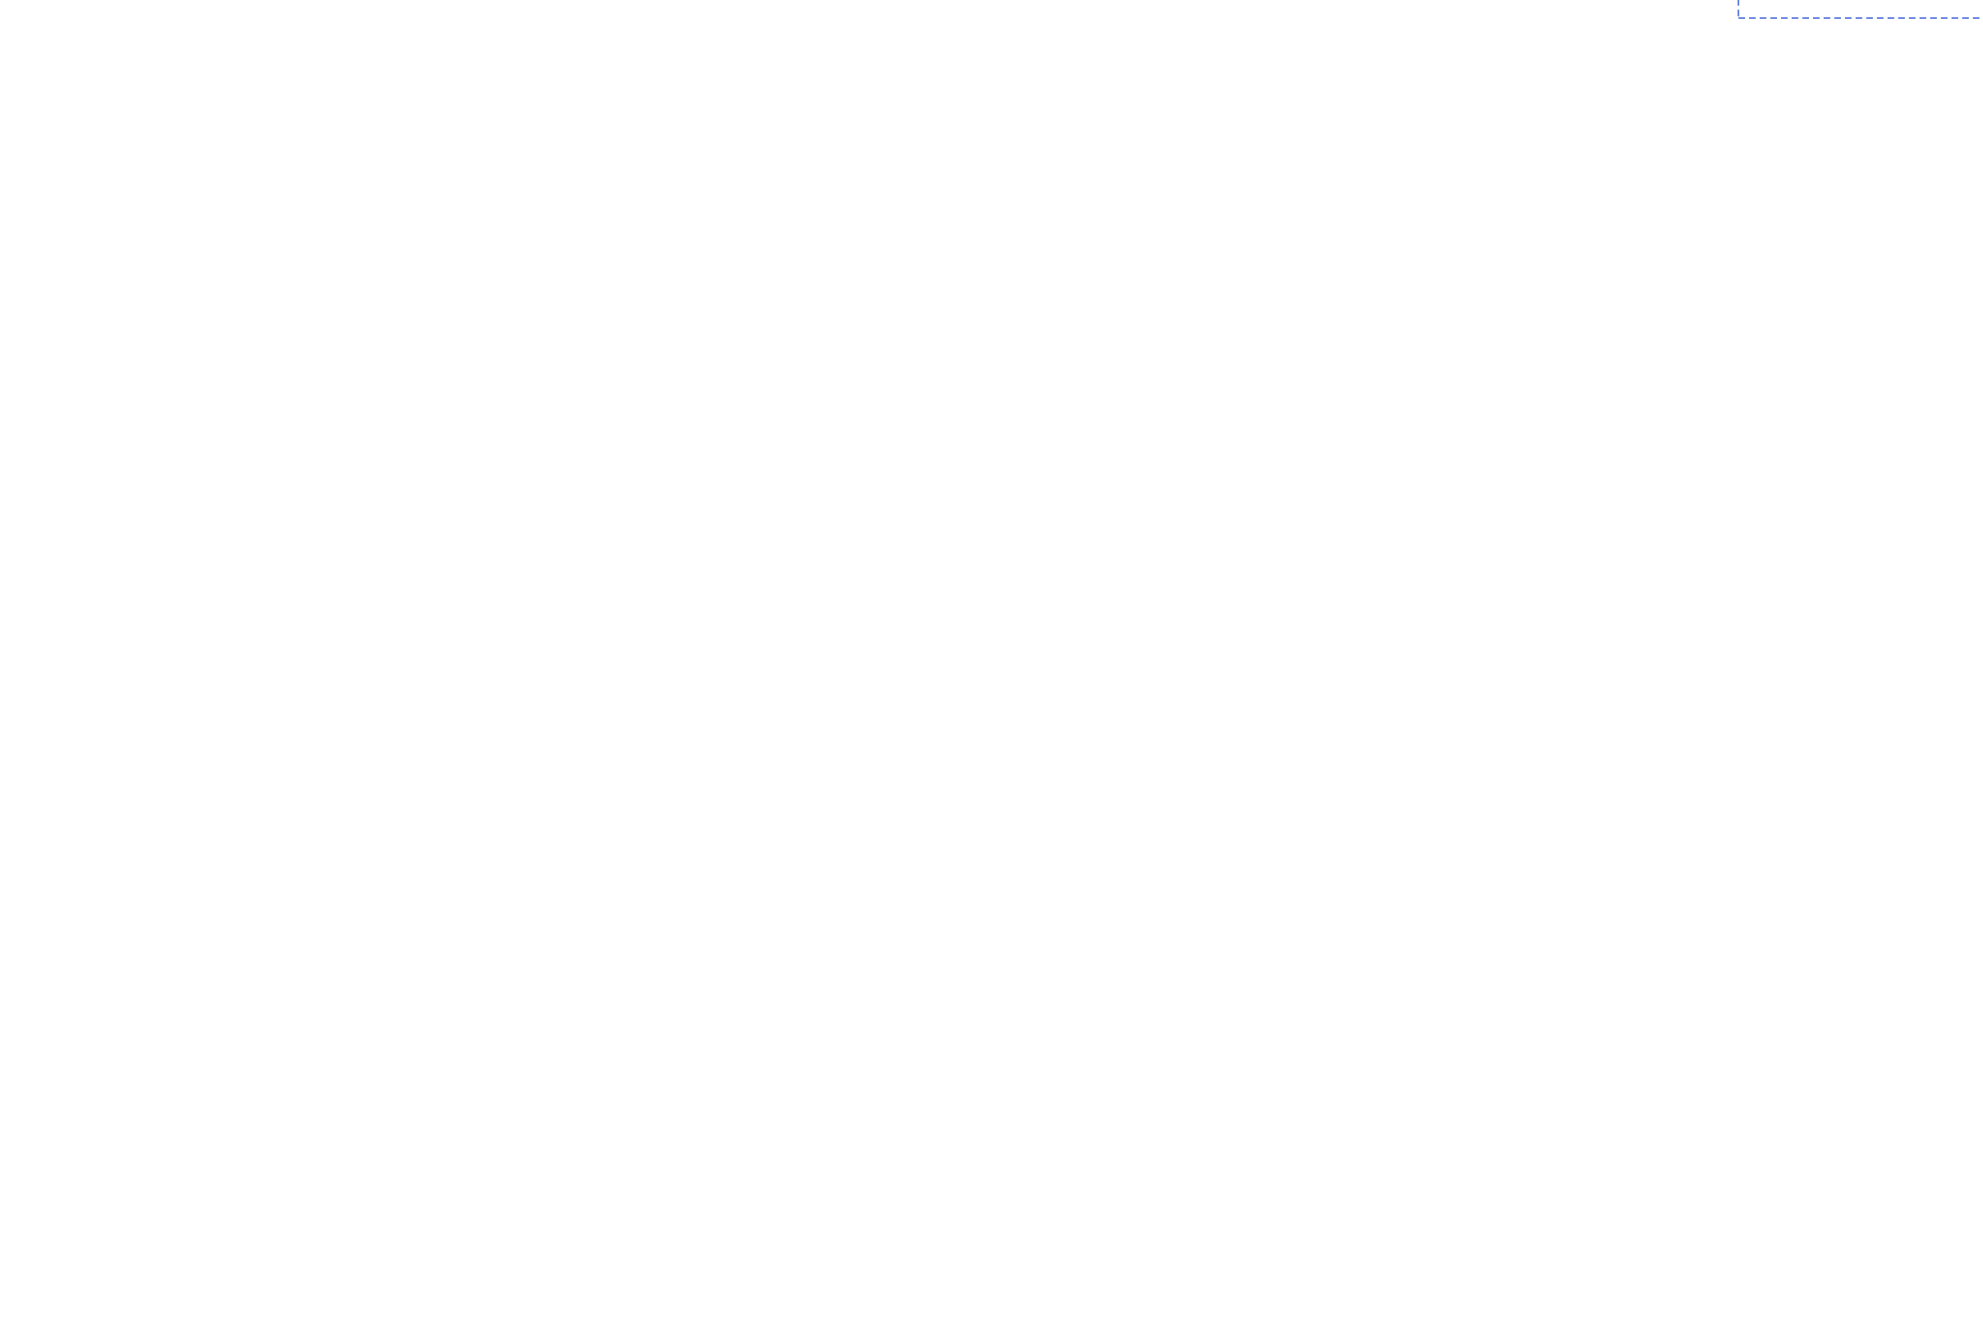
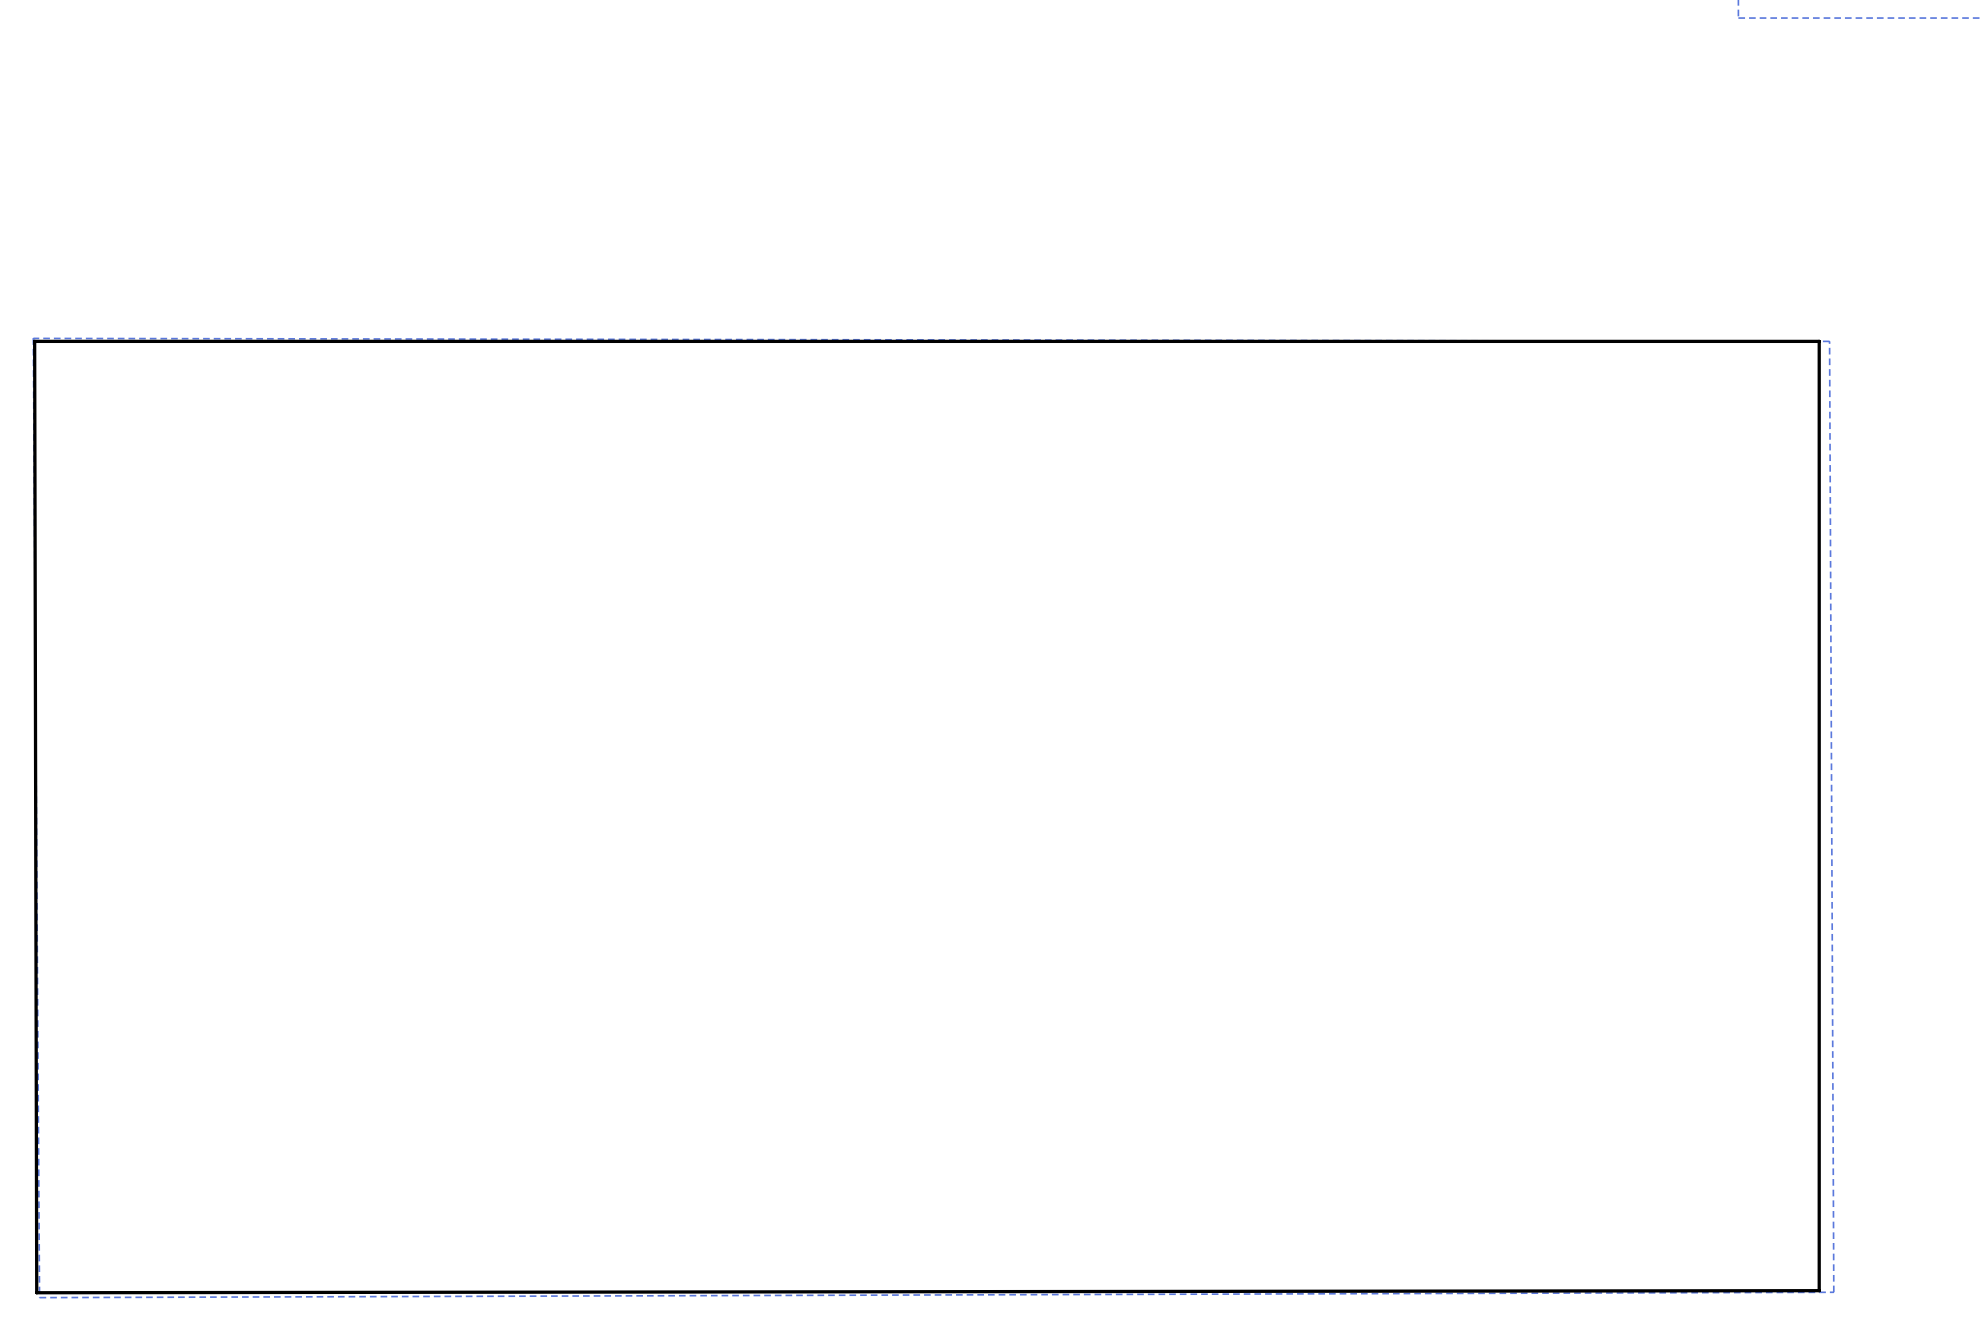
bottom zone outline: none -> (33, 338) (39, 1297) (1833, 1292) (1829, 341) (33, 338)
board edge: none -> (34, 341) (36, 1292) (1819, 1290) (1819, 341) (34, 341)

